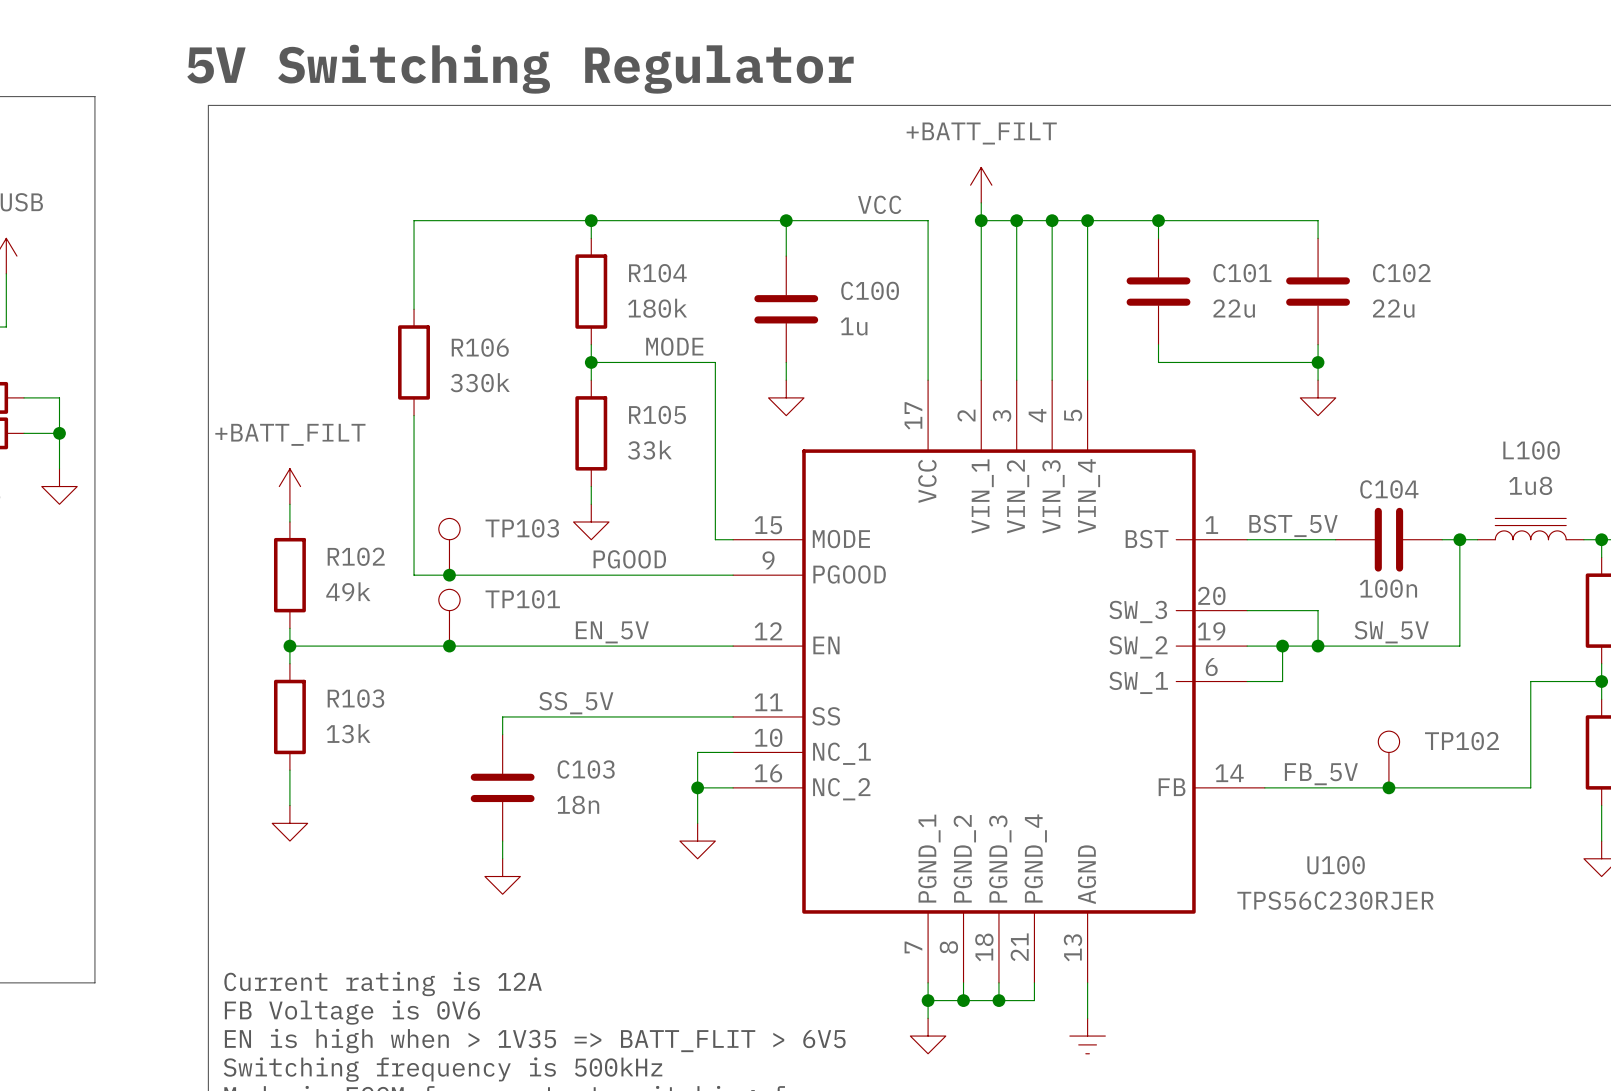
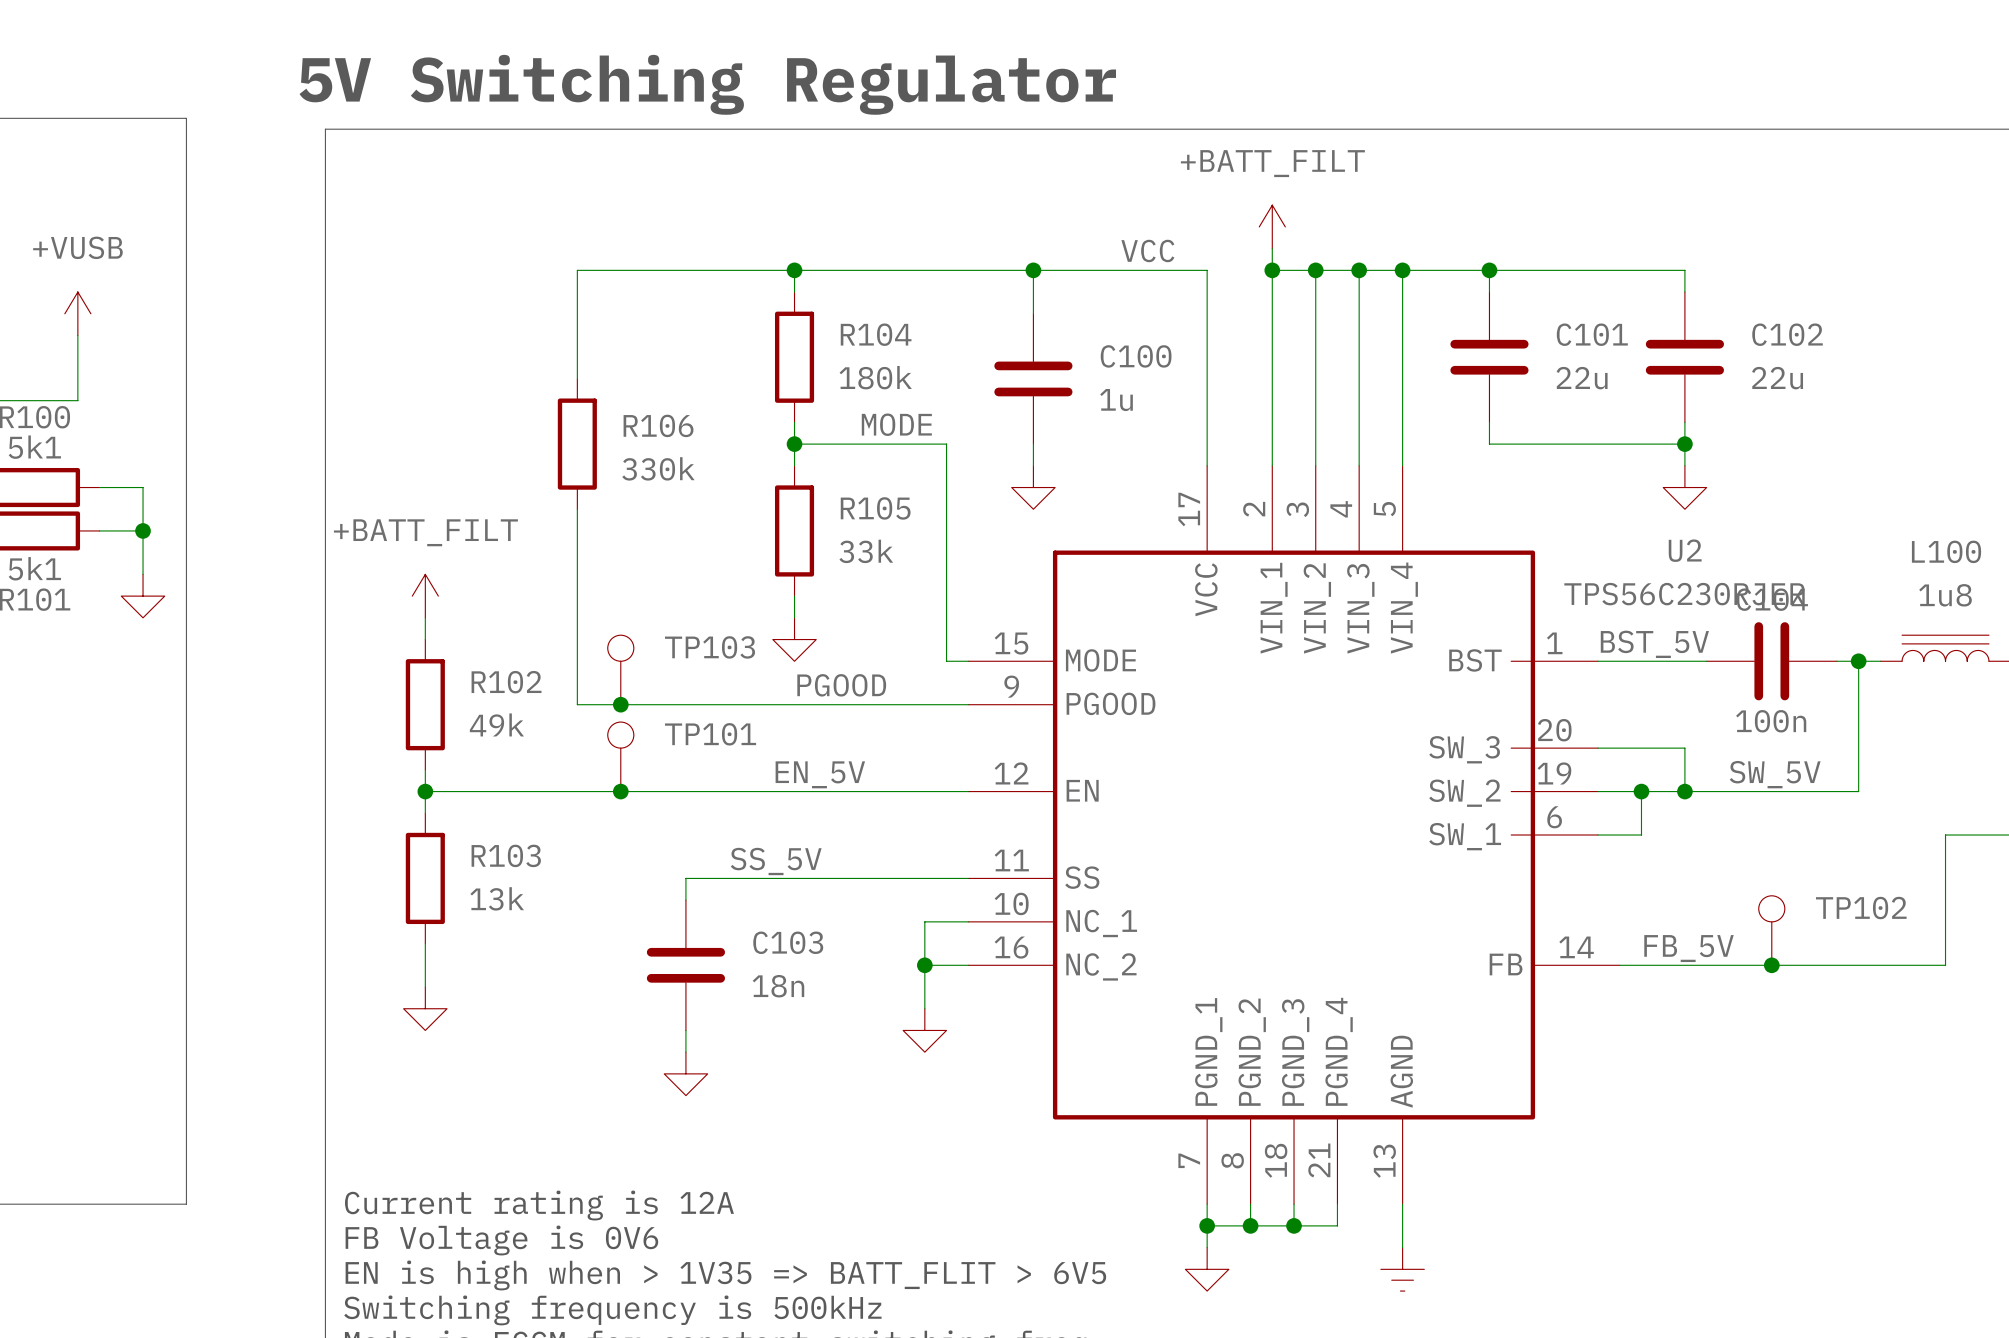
U100 name: U100 (1336, 865) -> U2 (1685, 550)
U100 value position: TPS56C230RJER (1335, 900) -> TPS56C230RJER (1684, 594)

